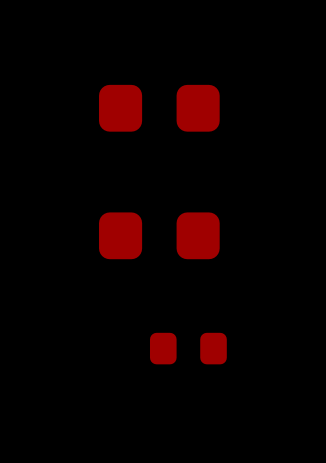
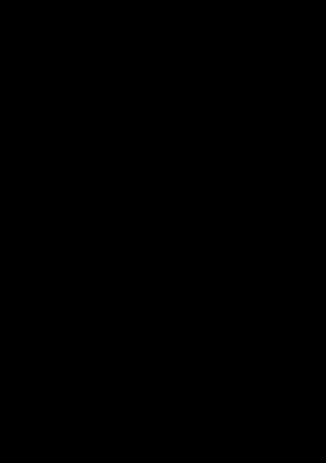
part: (159, 108) -> none
part: (159, 235) -> none
part: (188, 348) -> none

